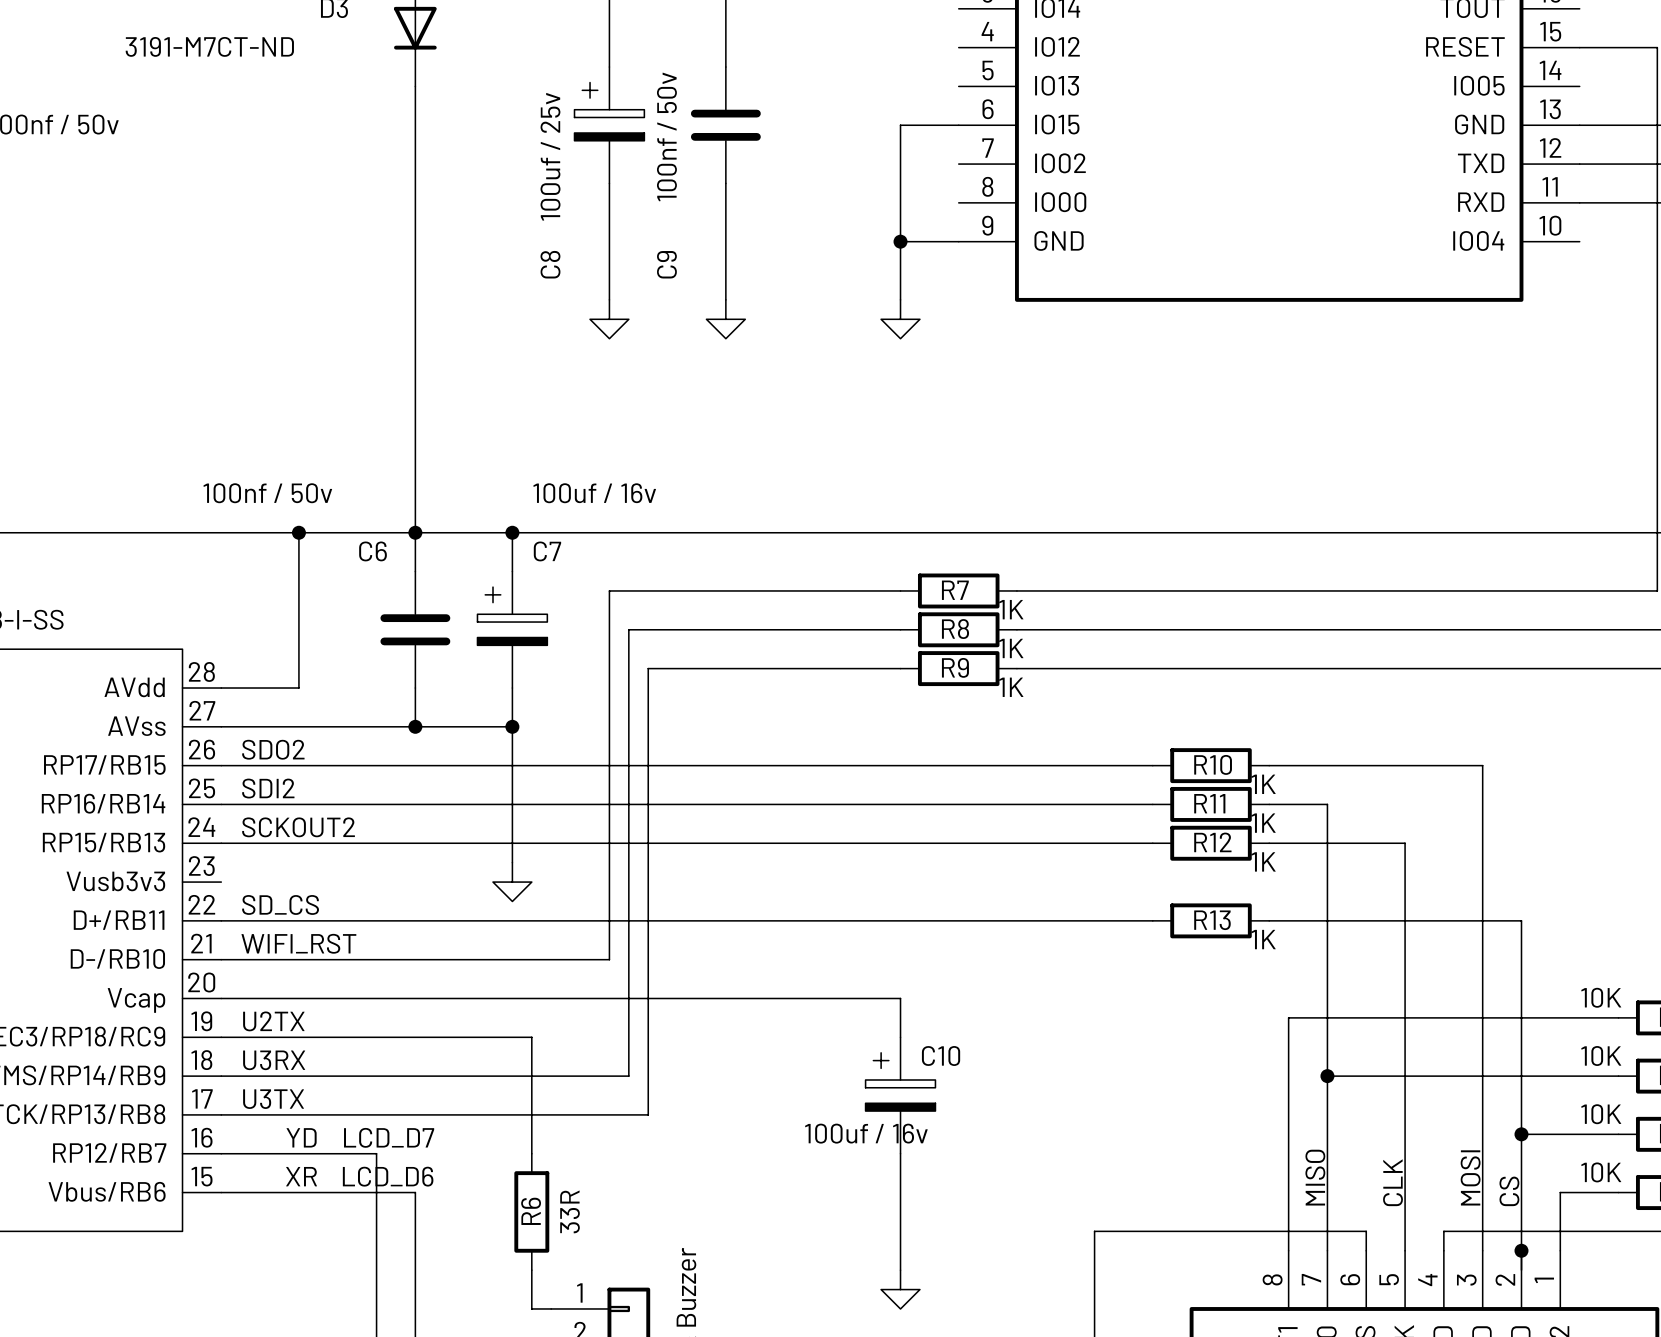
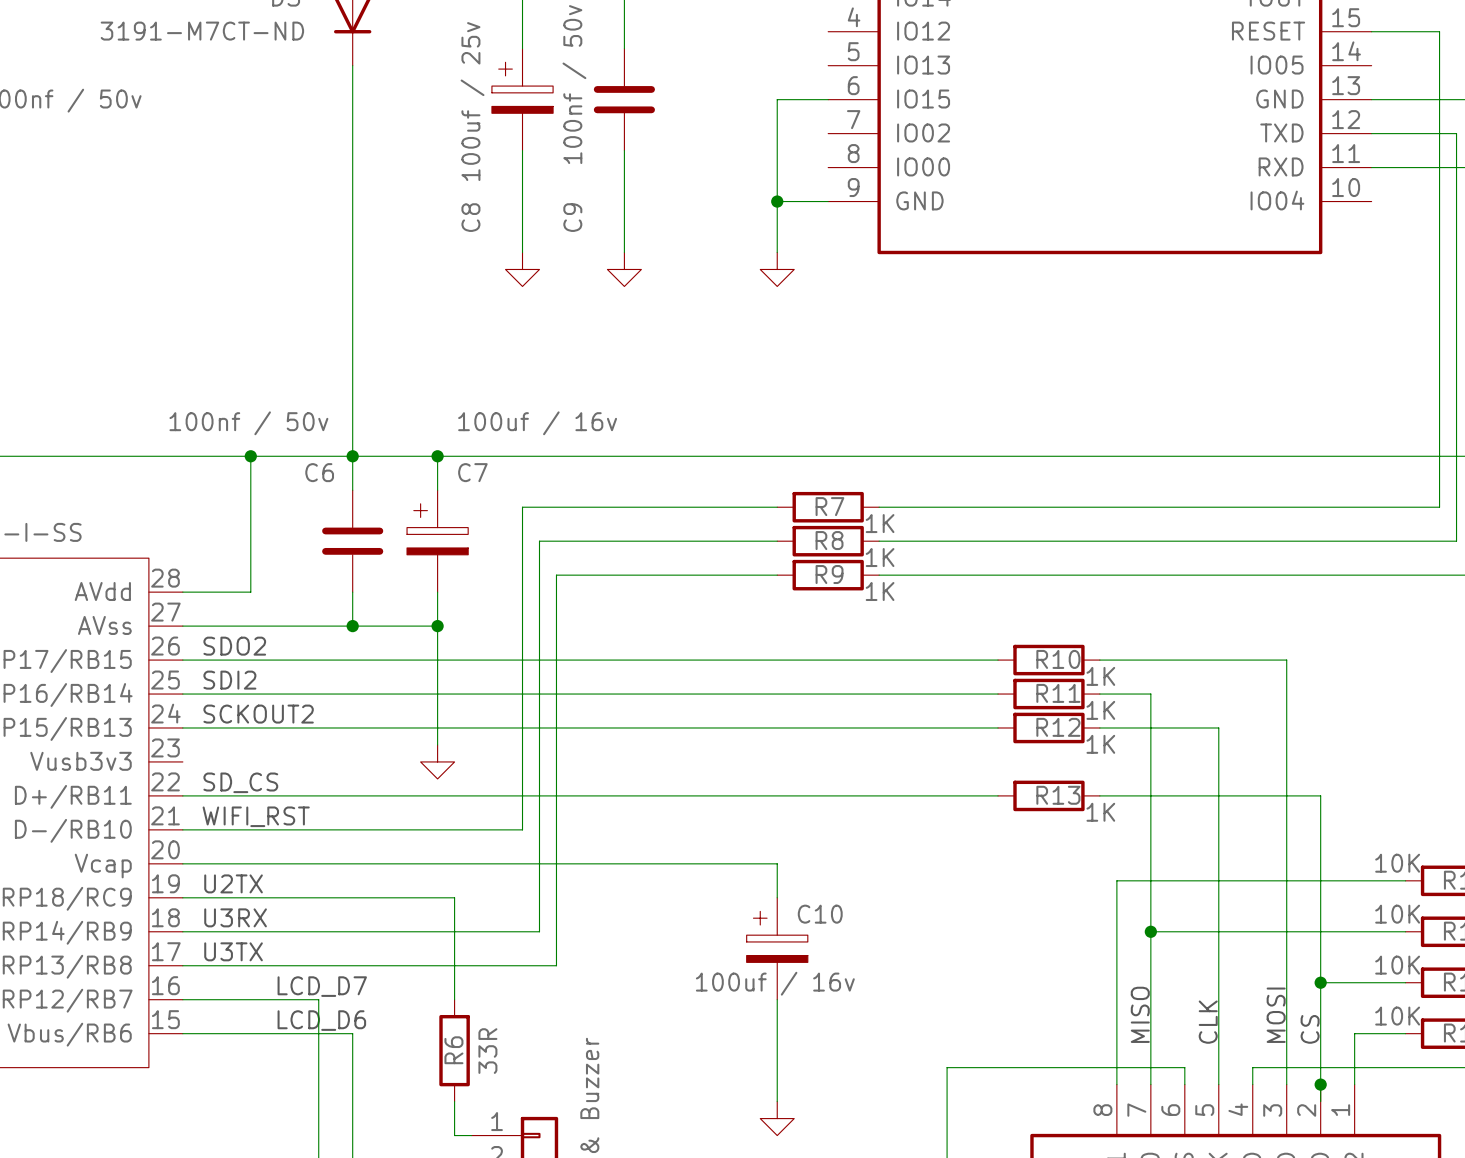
text: YD (301, 1137) -> none
text: XR (301, 1176) -> none

